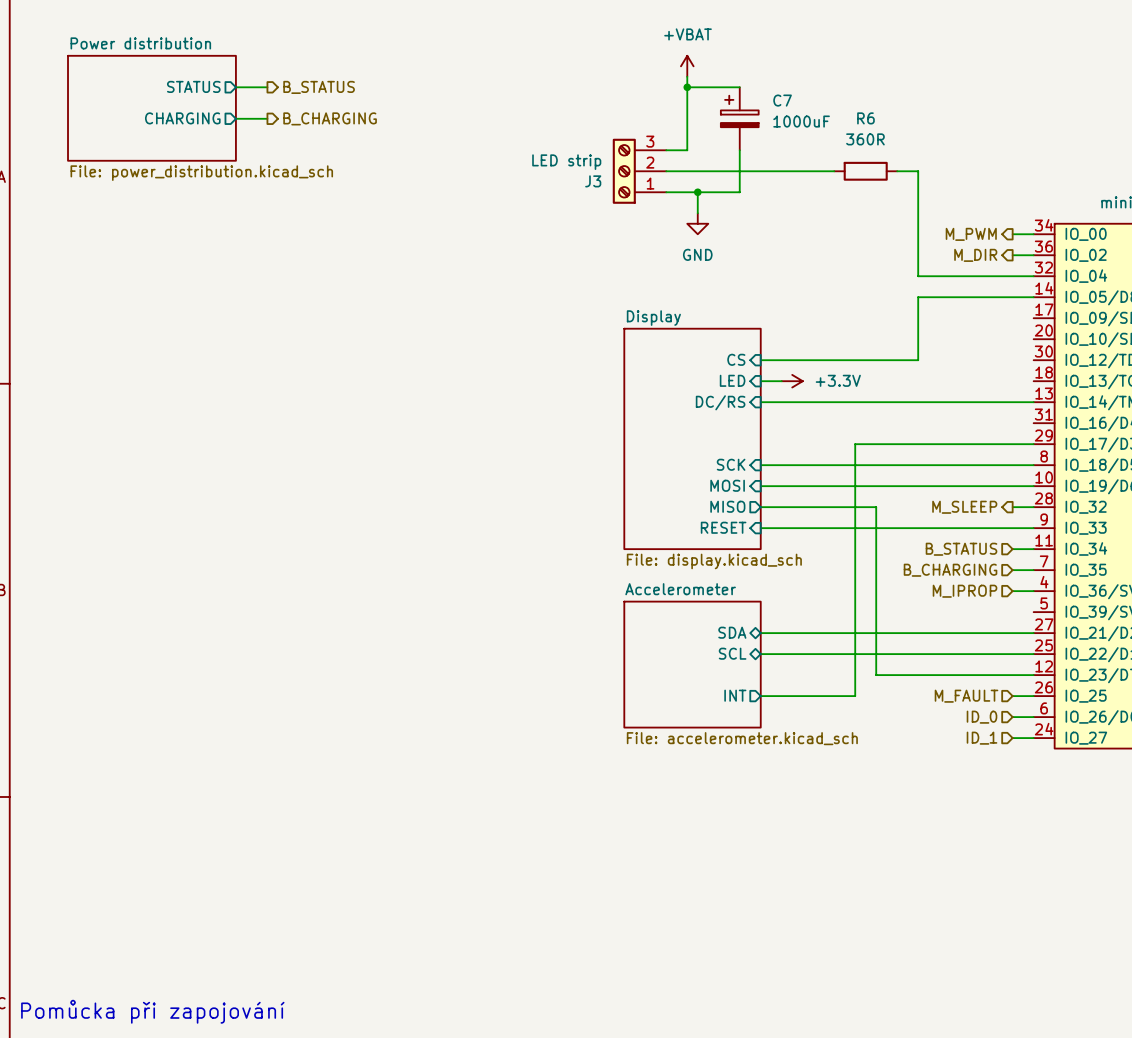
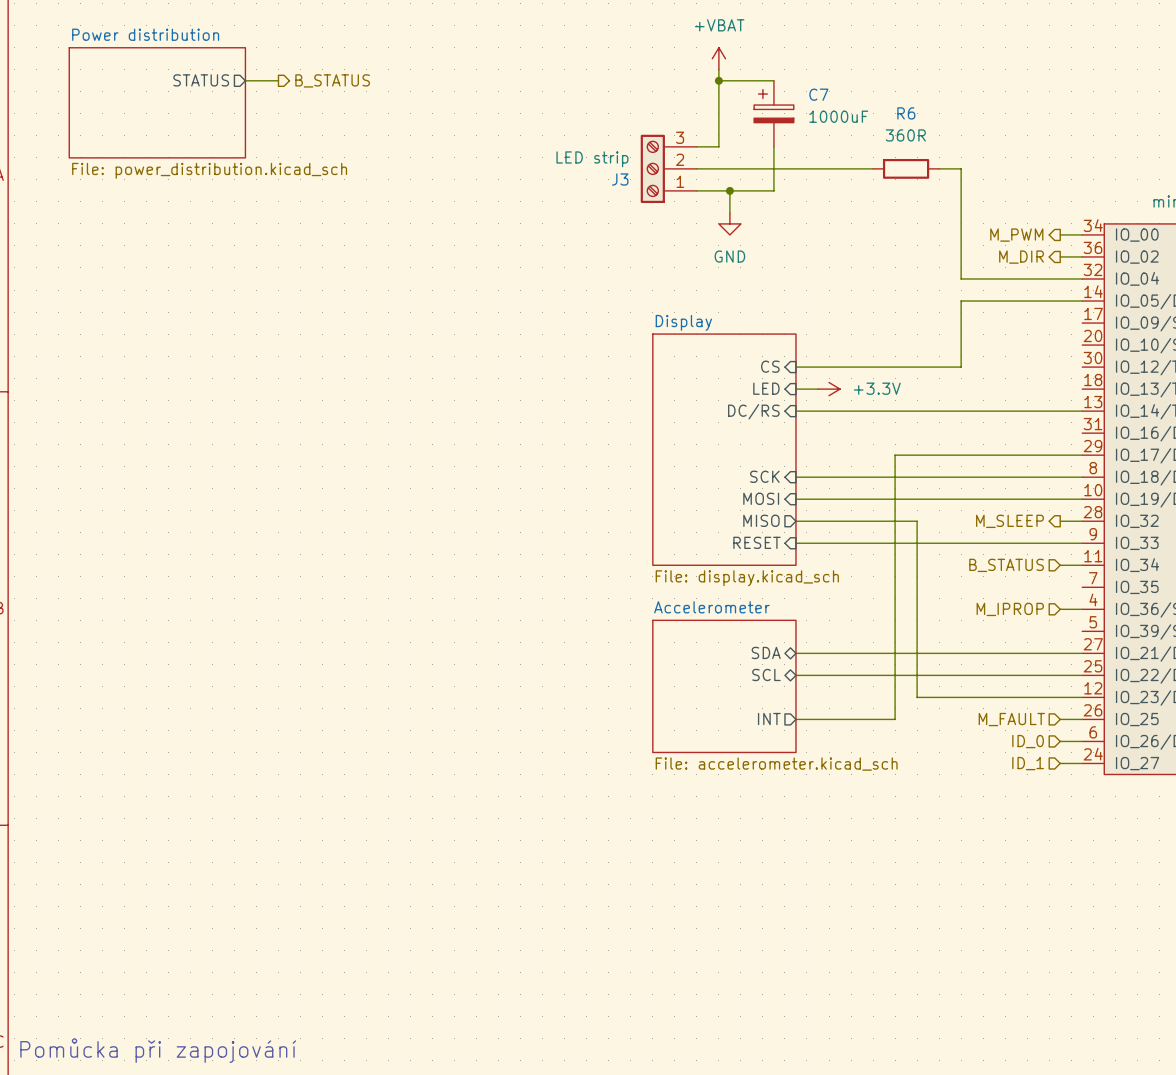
sheet pin: CHARGING (182, 118) -> none
wire: (235, 118) (267, 118) -> none
hierarchical label: B_CHARGING (330, 118) -> none
hierarchical label: B_CHARGING (950, 570) -> none
wire: (1012, 570) (1033, 570) -> none

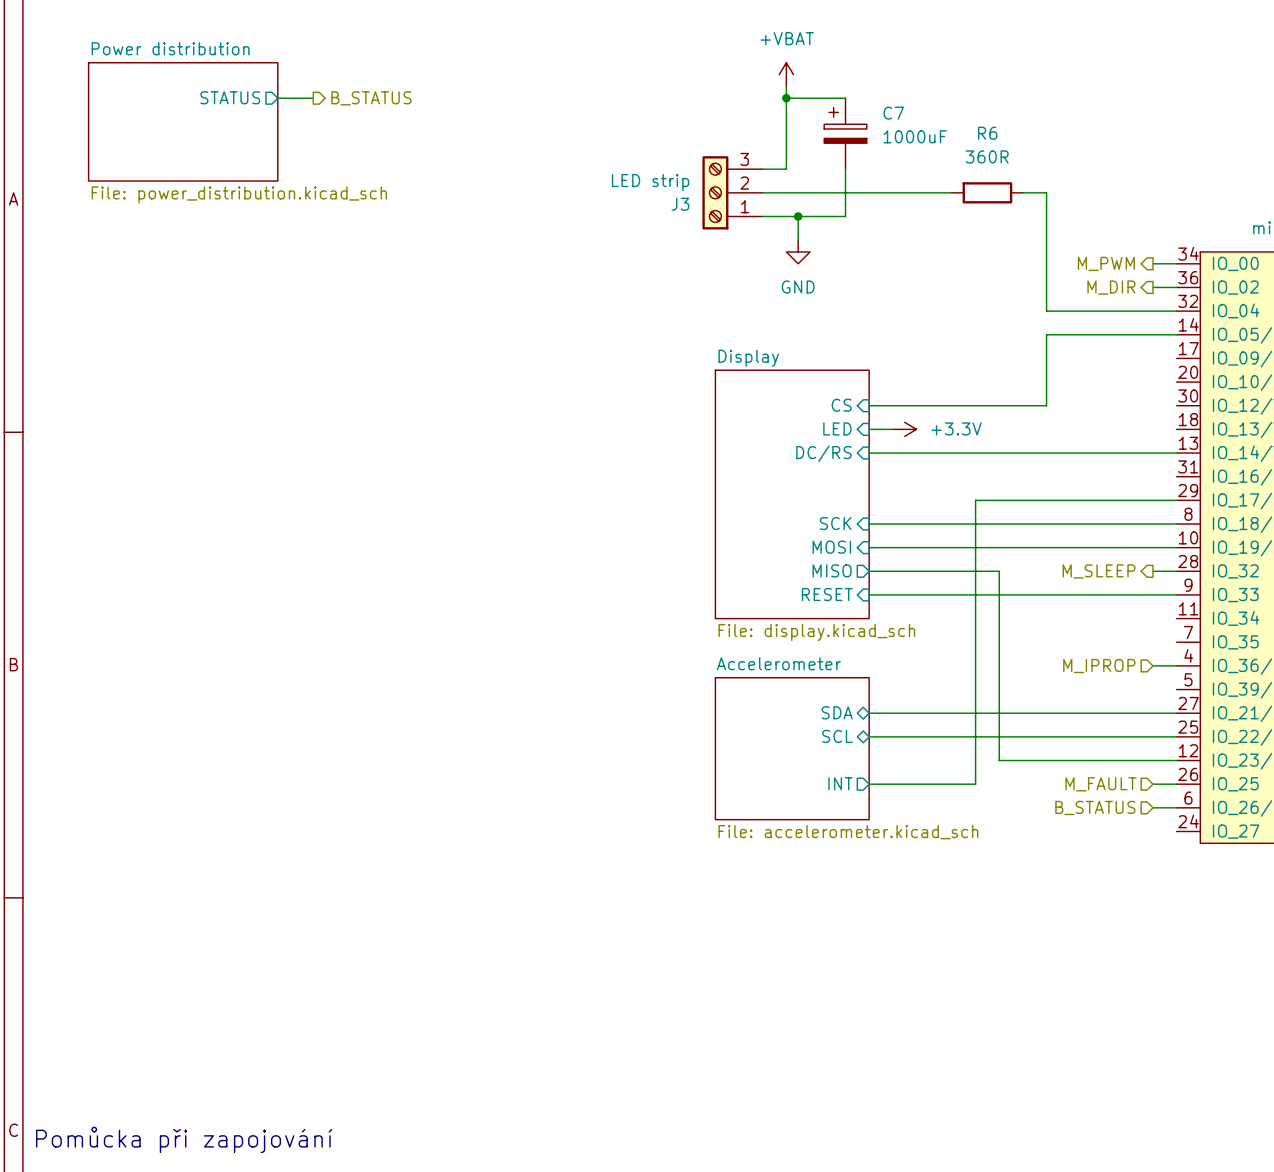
hierarchical label: B_STATUS (1006, 565) -> none
wire: (1060, 565) (1082, 565) -> none
hierarchical label: ID_0 (1028, 741) -> B_STATUS (1095, 807)
hierarchical label: ID_1 (1028, 763) -> none
wire: (1060, 763) (1082, 763) -> none

